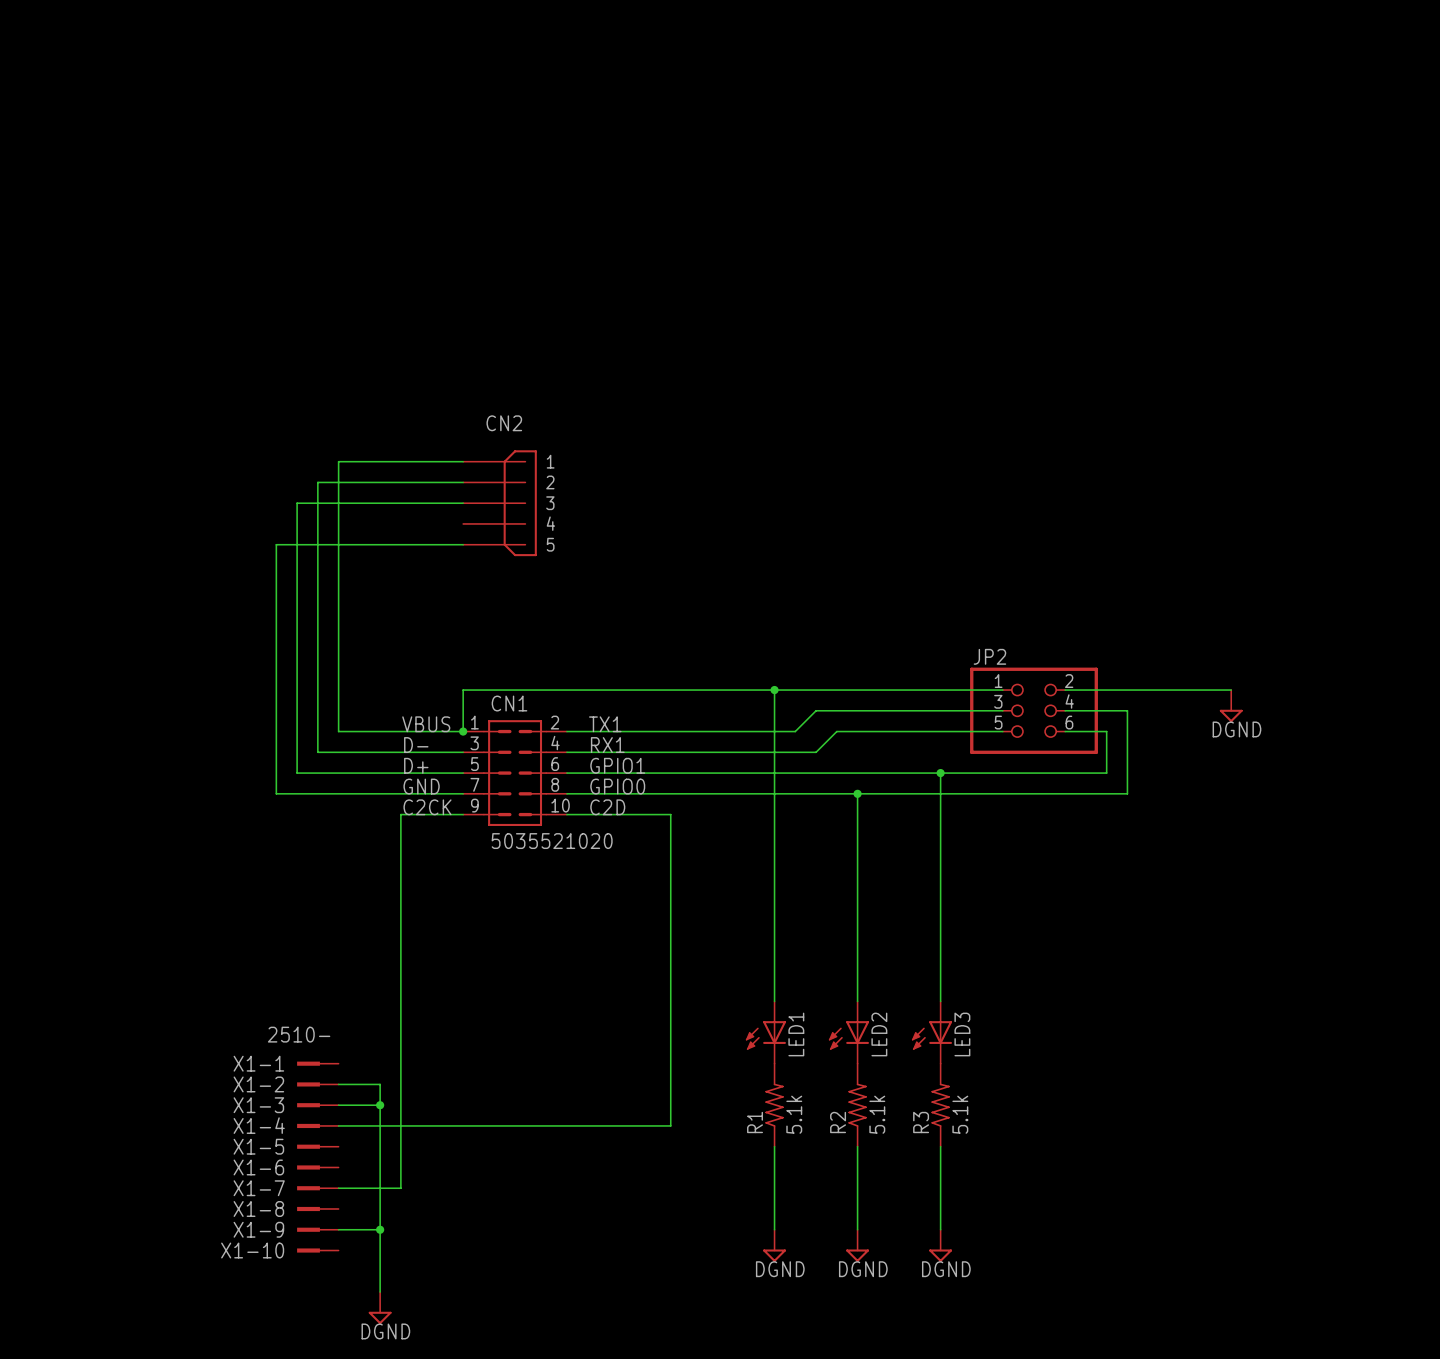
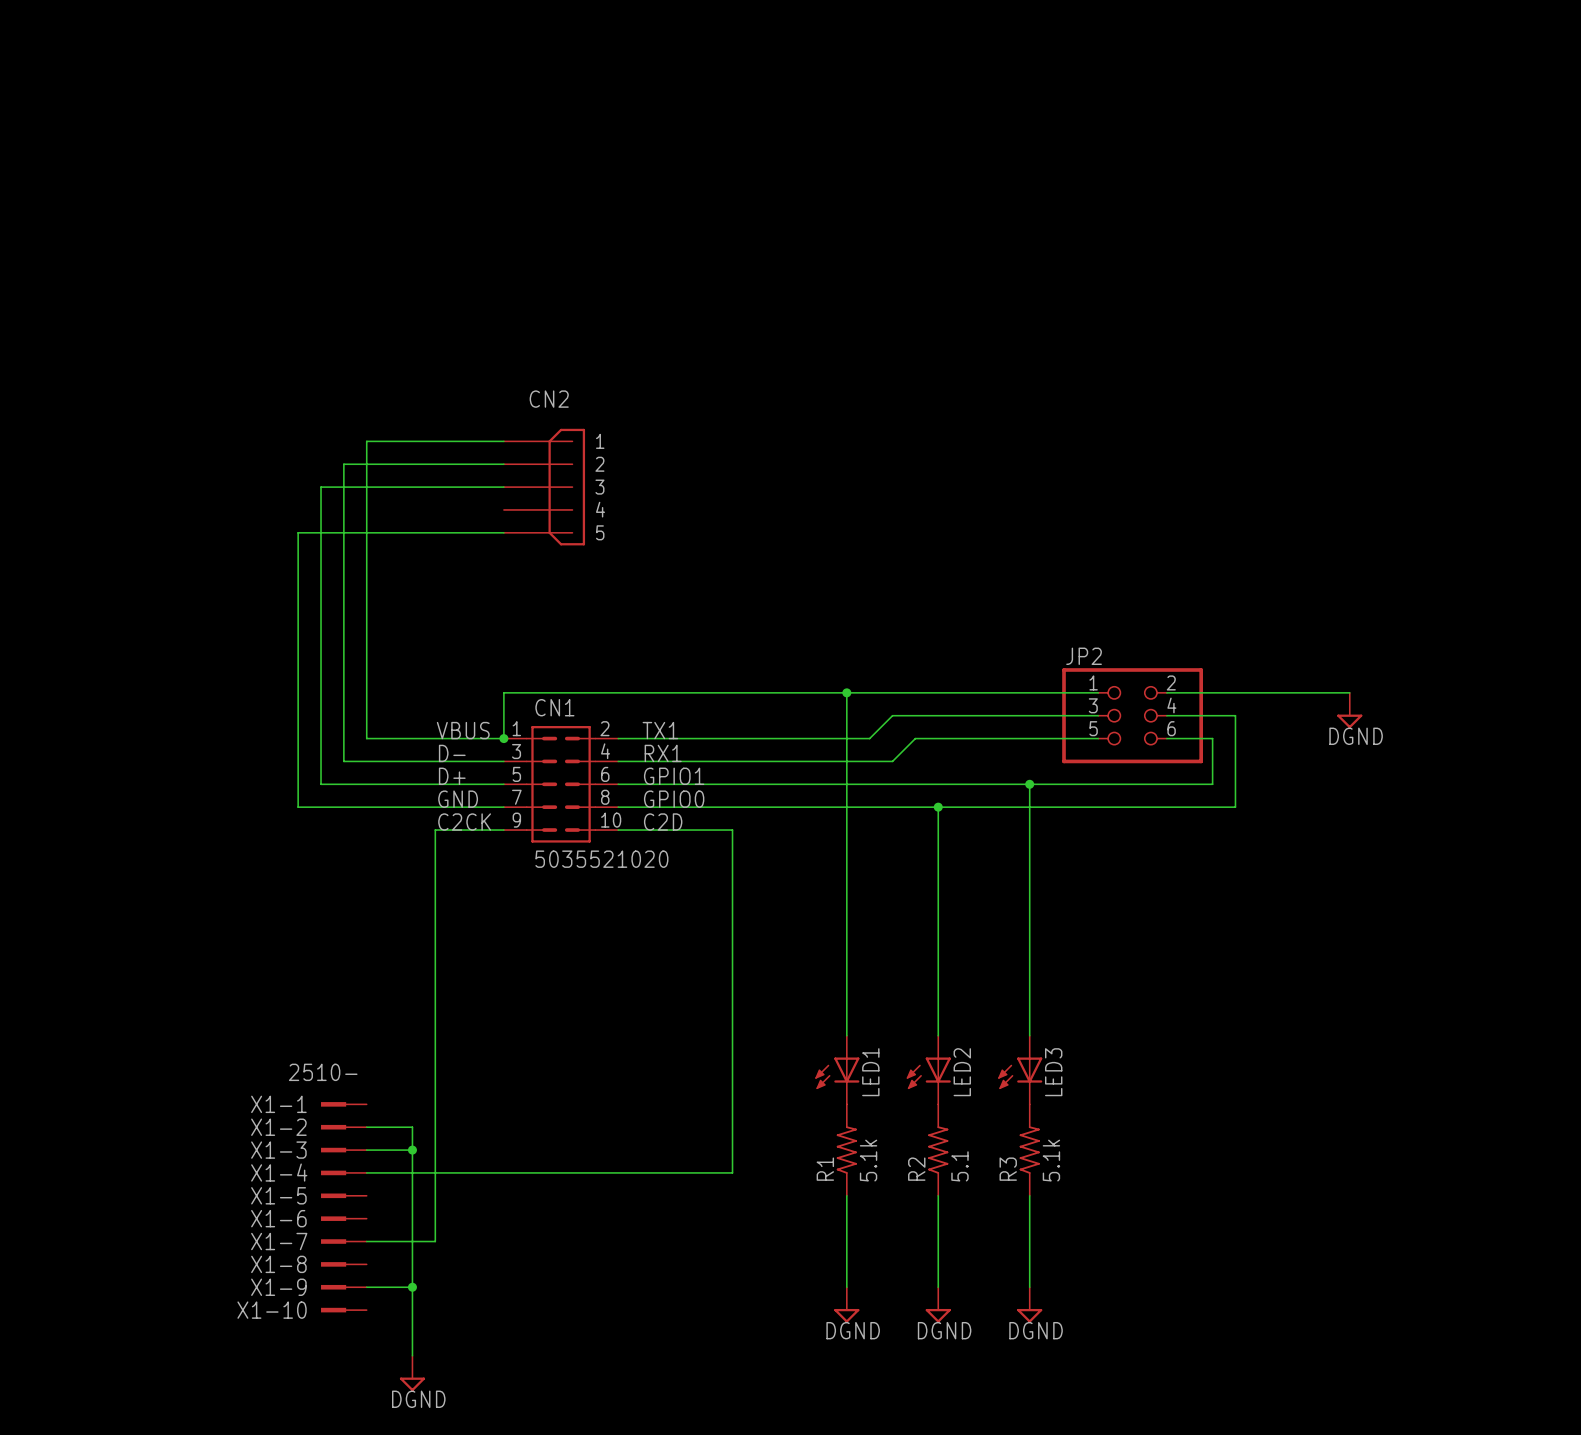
R2 value: 5.1k (877, 1114) -> 5.1 (959, 1166)

